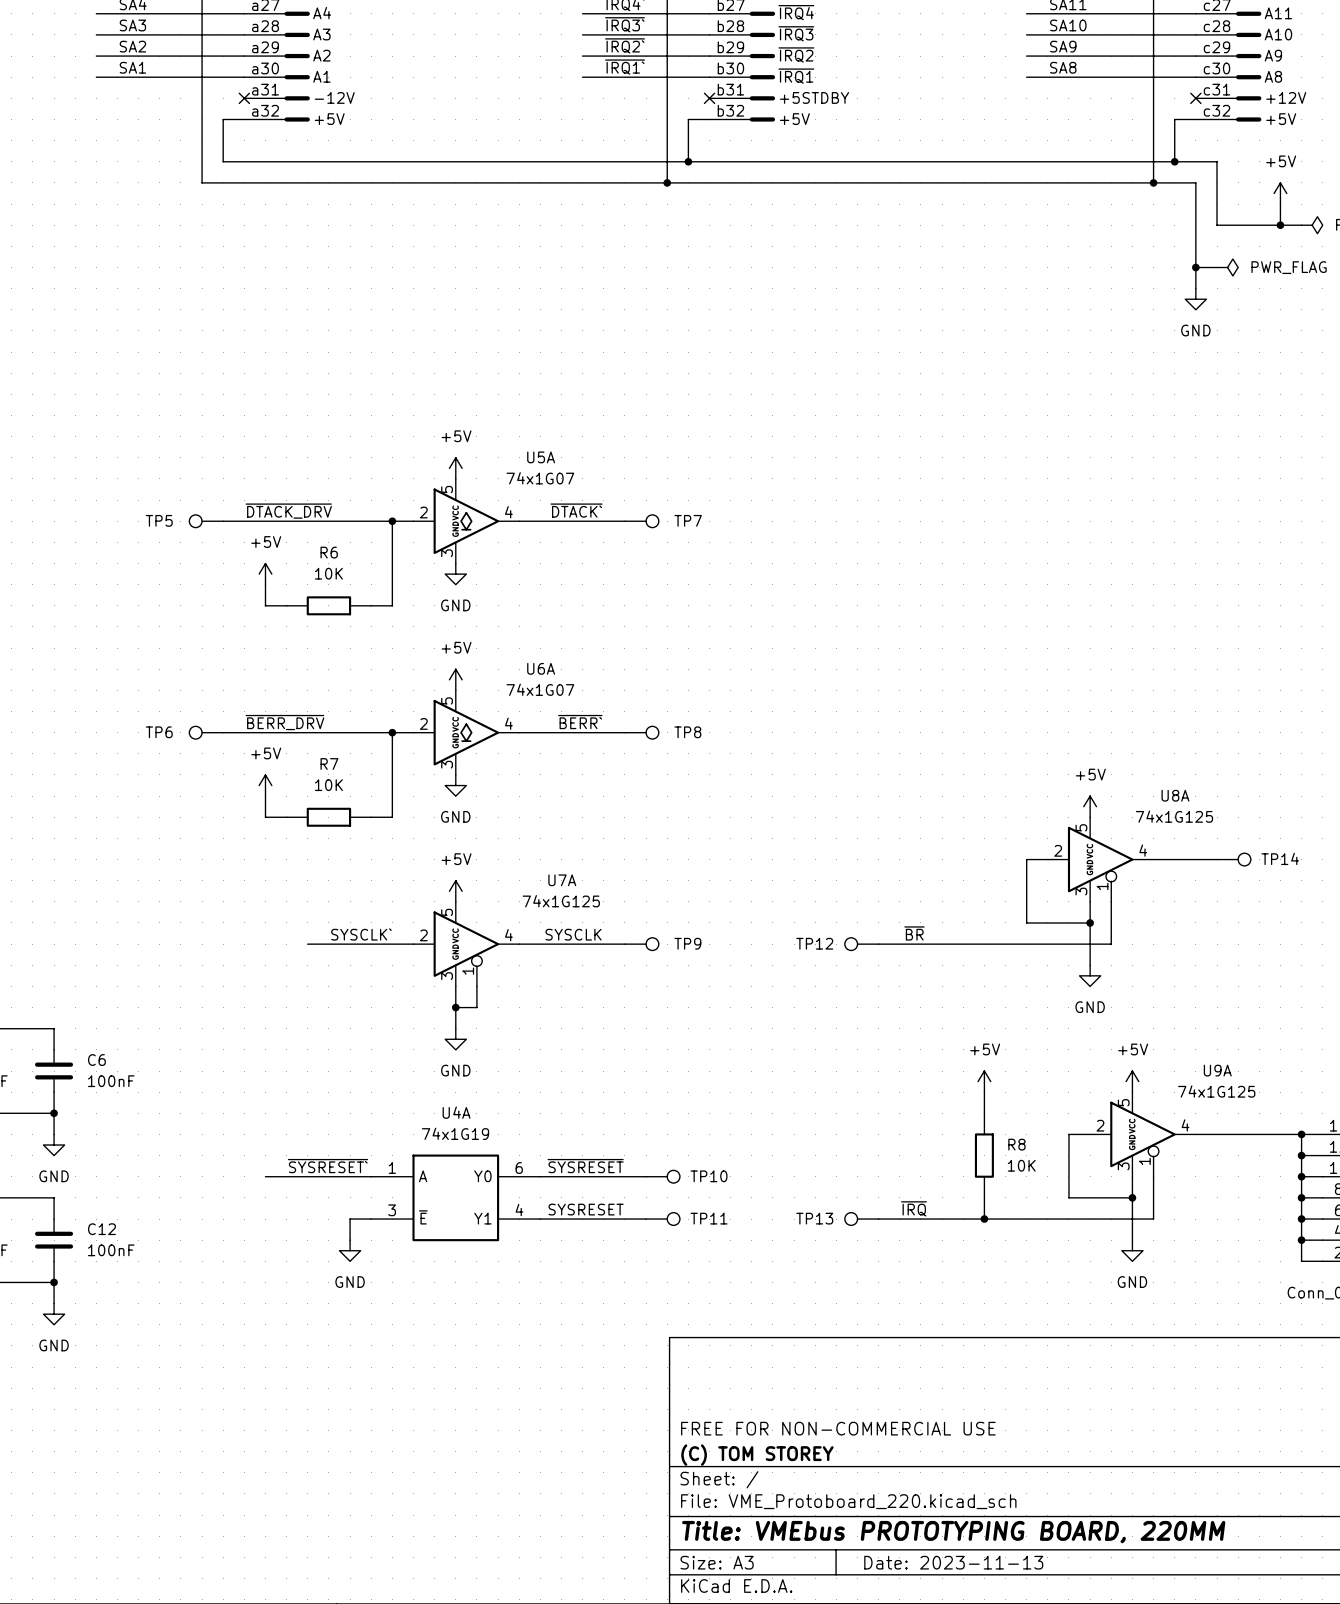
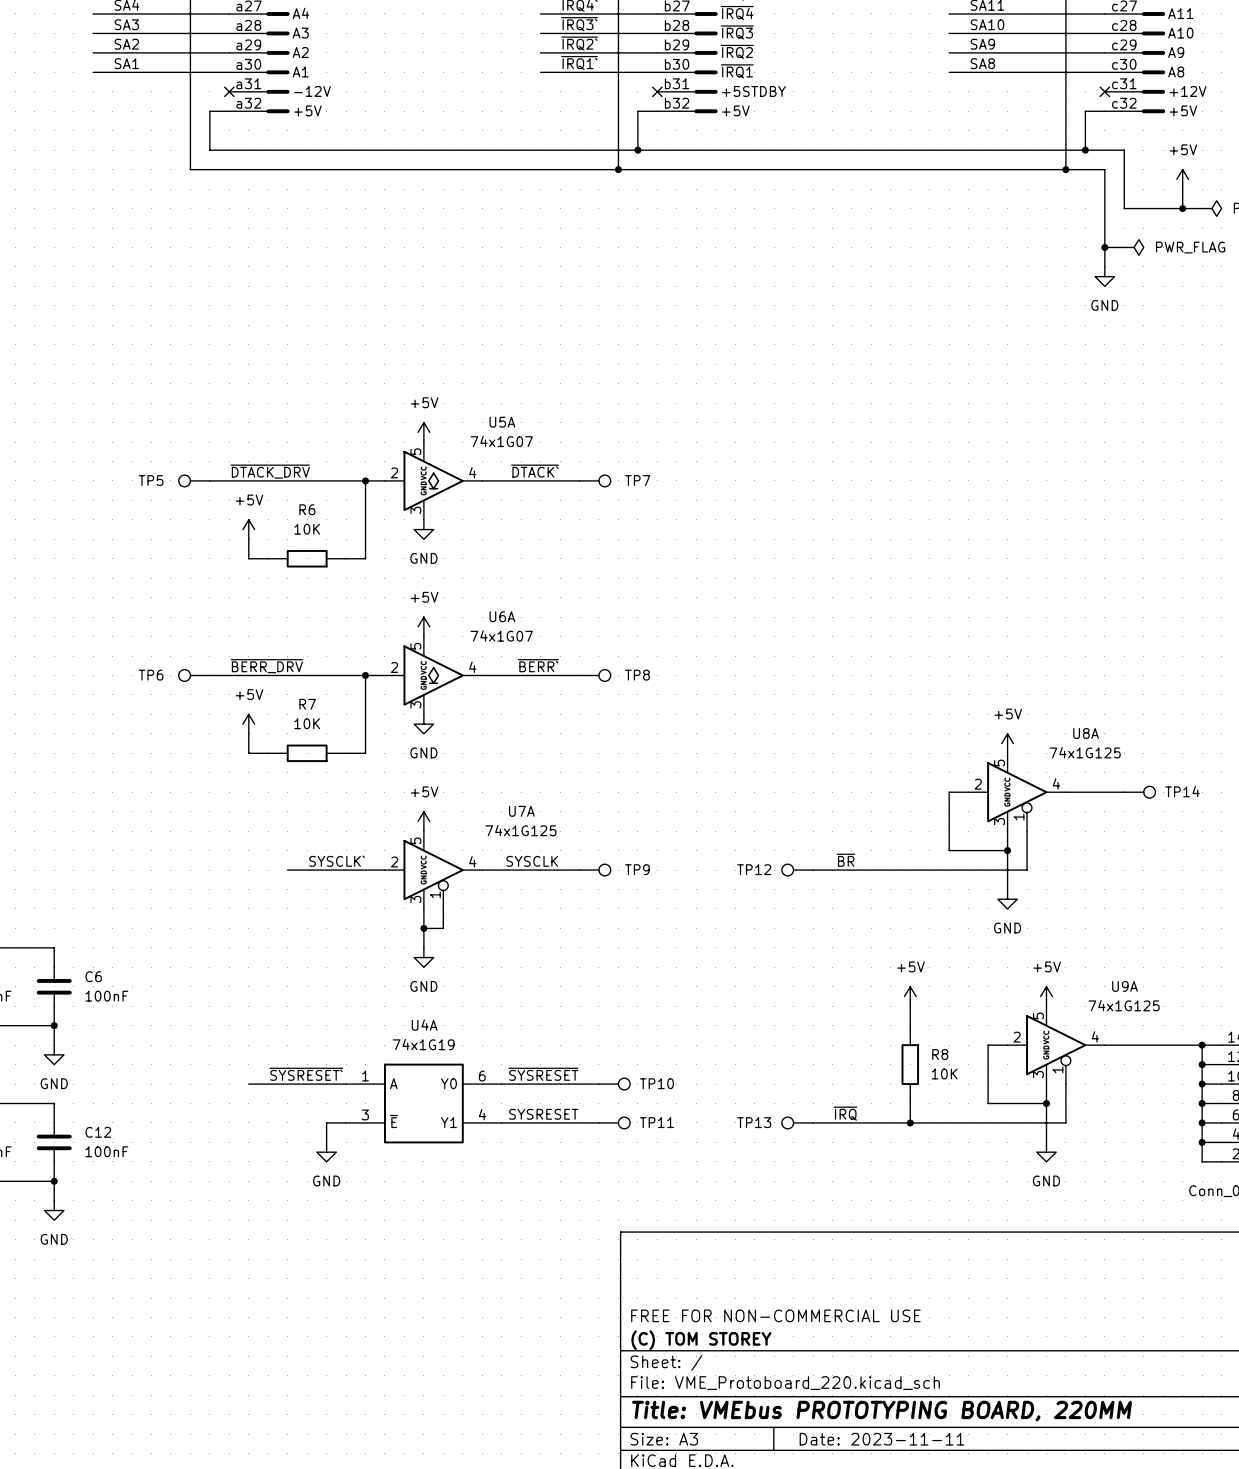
title block: Date: 2023-11-13 (953, 1562) -> Date: 2023-11-11 (882, 1439)

